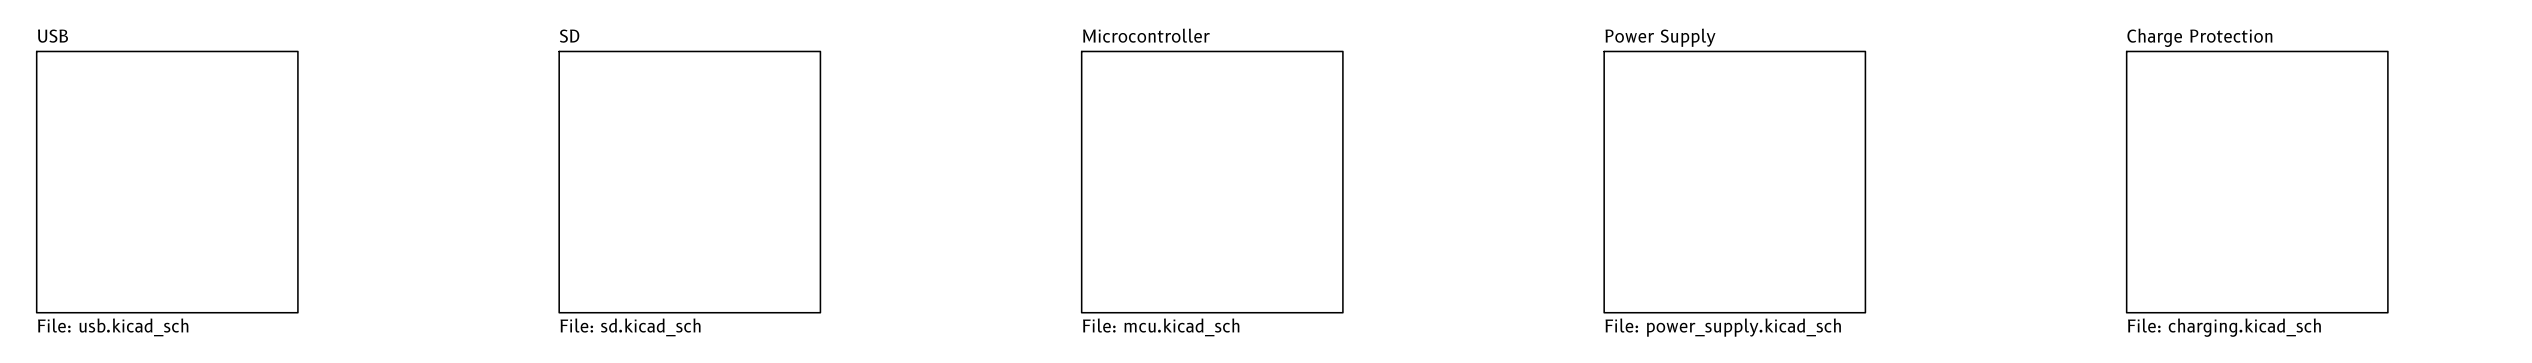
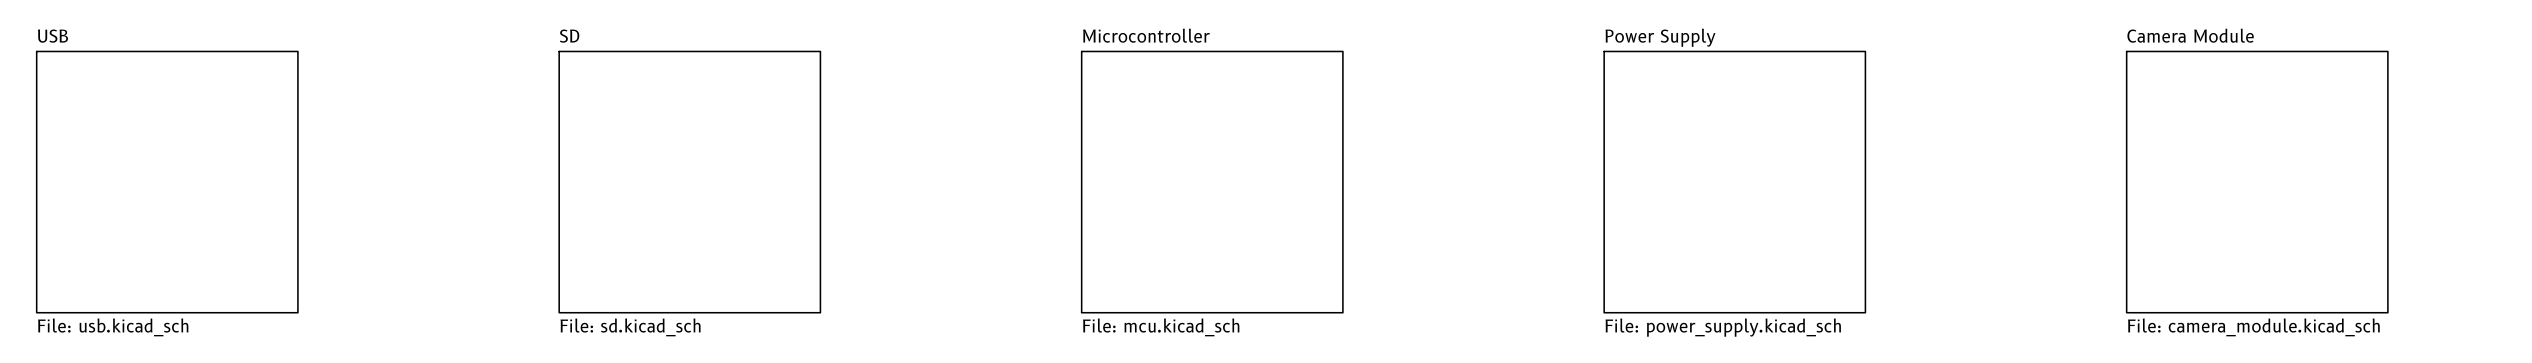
sheet Charge Protection name: Charge Protection (2199, 37) -> Camera Module (2190, 35)
sheet Charge Protection value: File: charging.kicad_sch (2224, 327) -> File: camera_module.kicad_sch (2253, 327)

